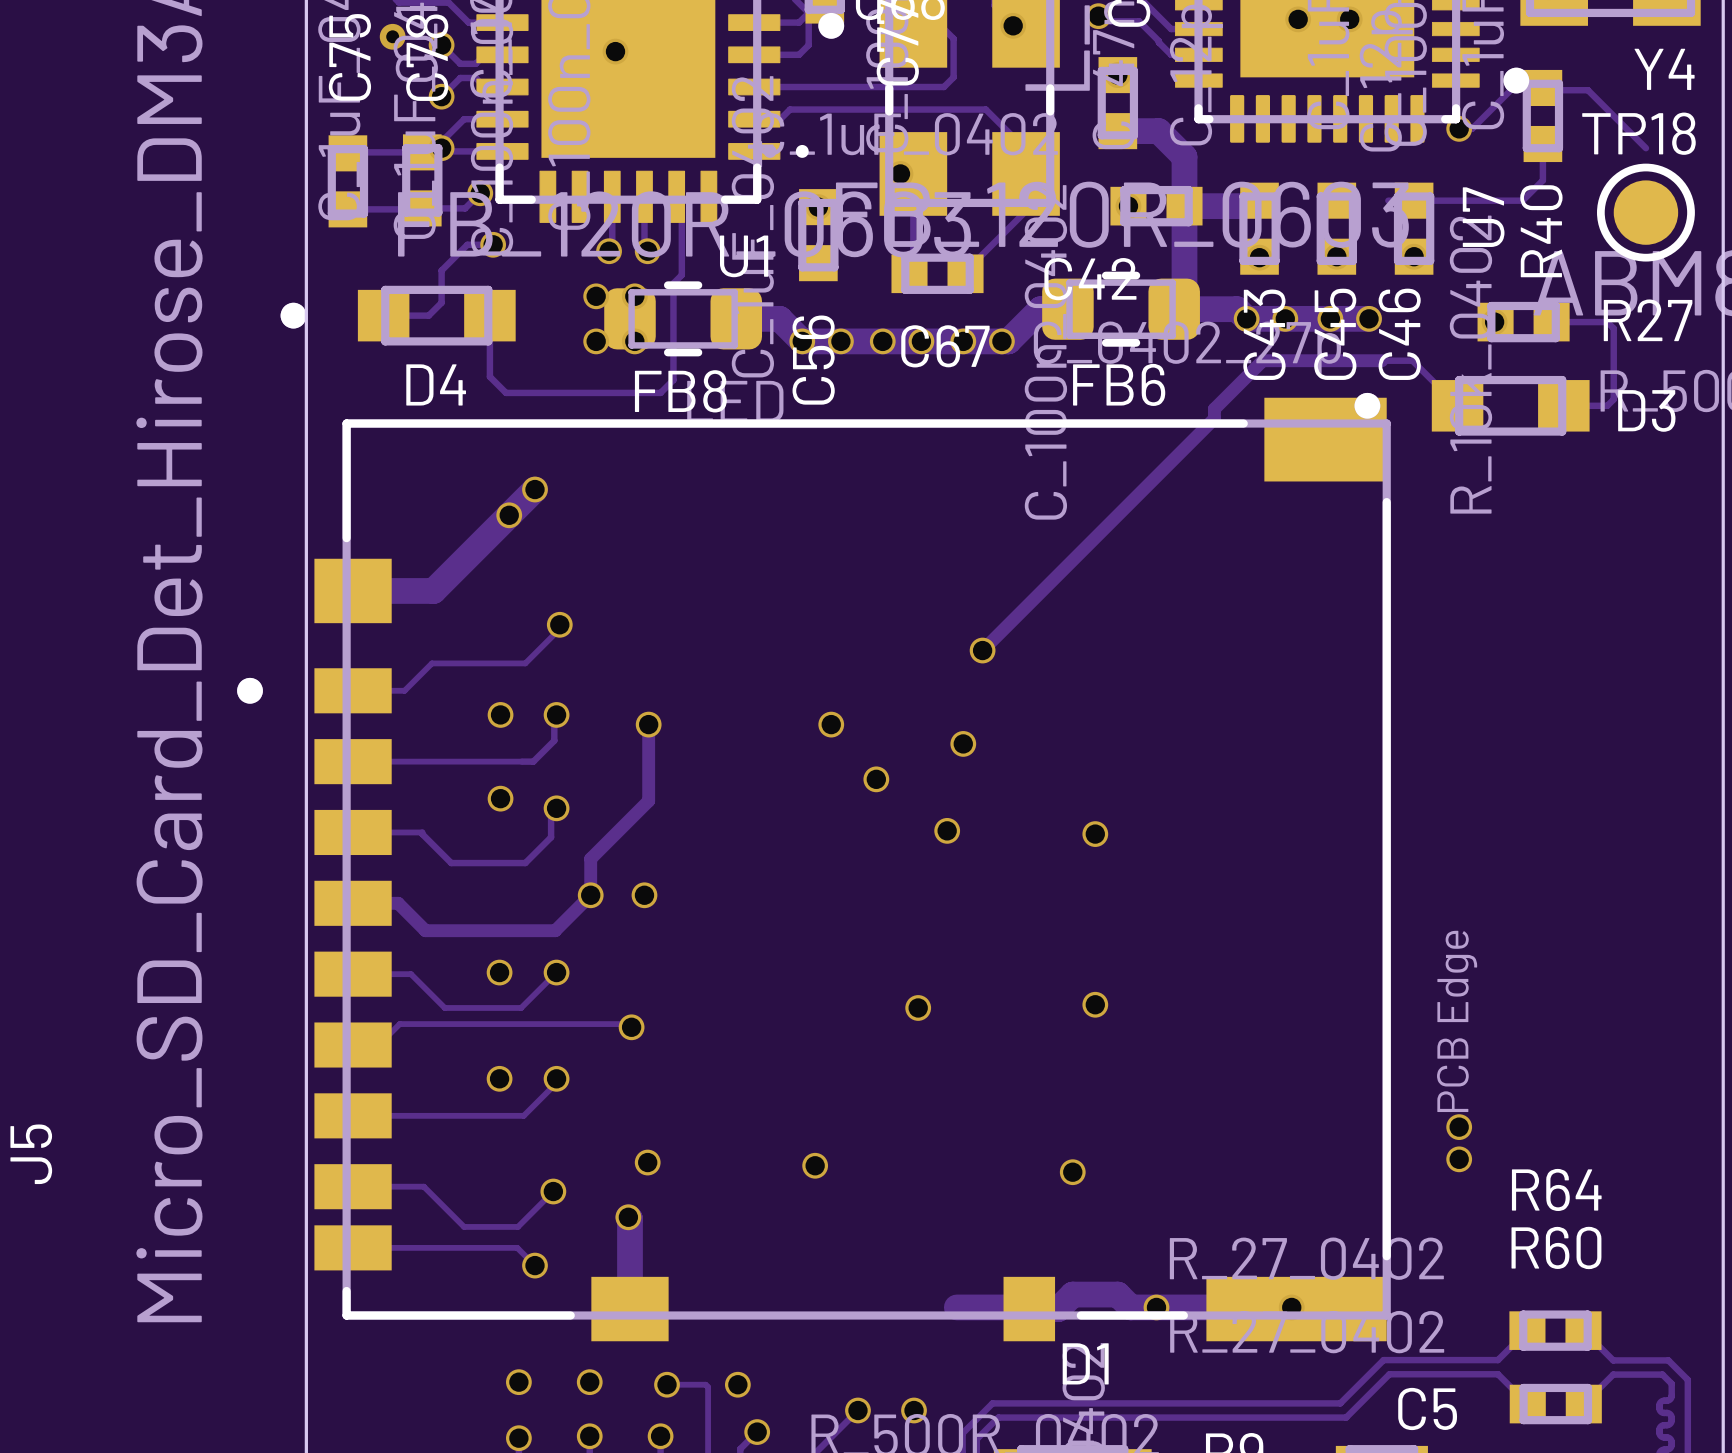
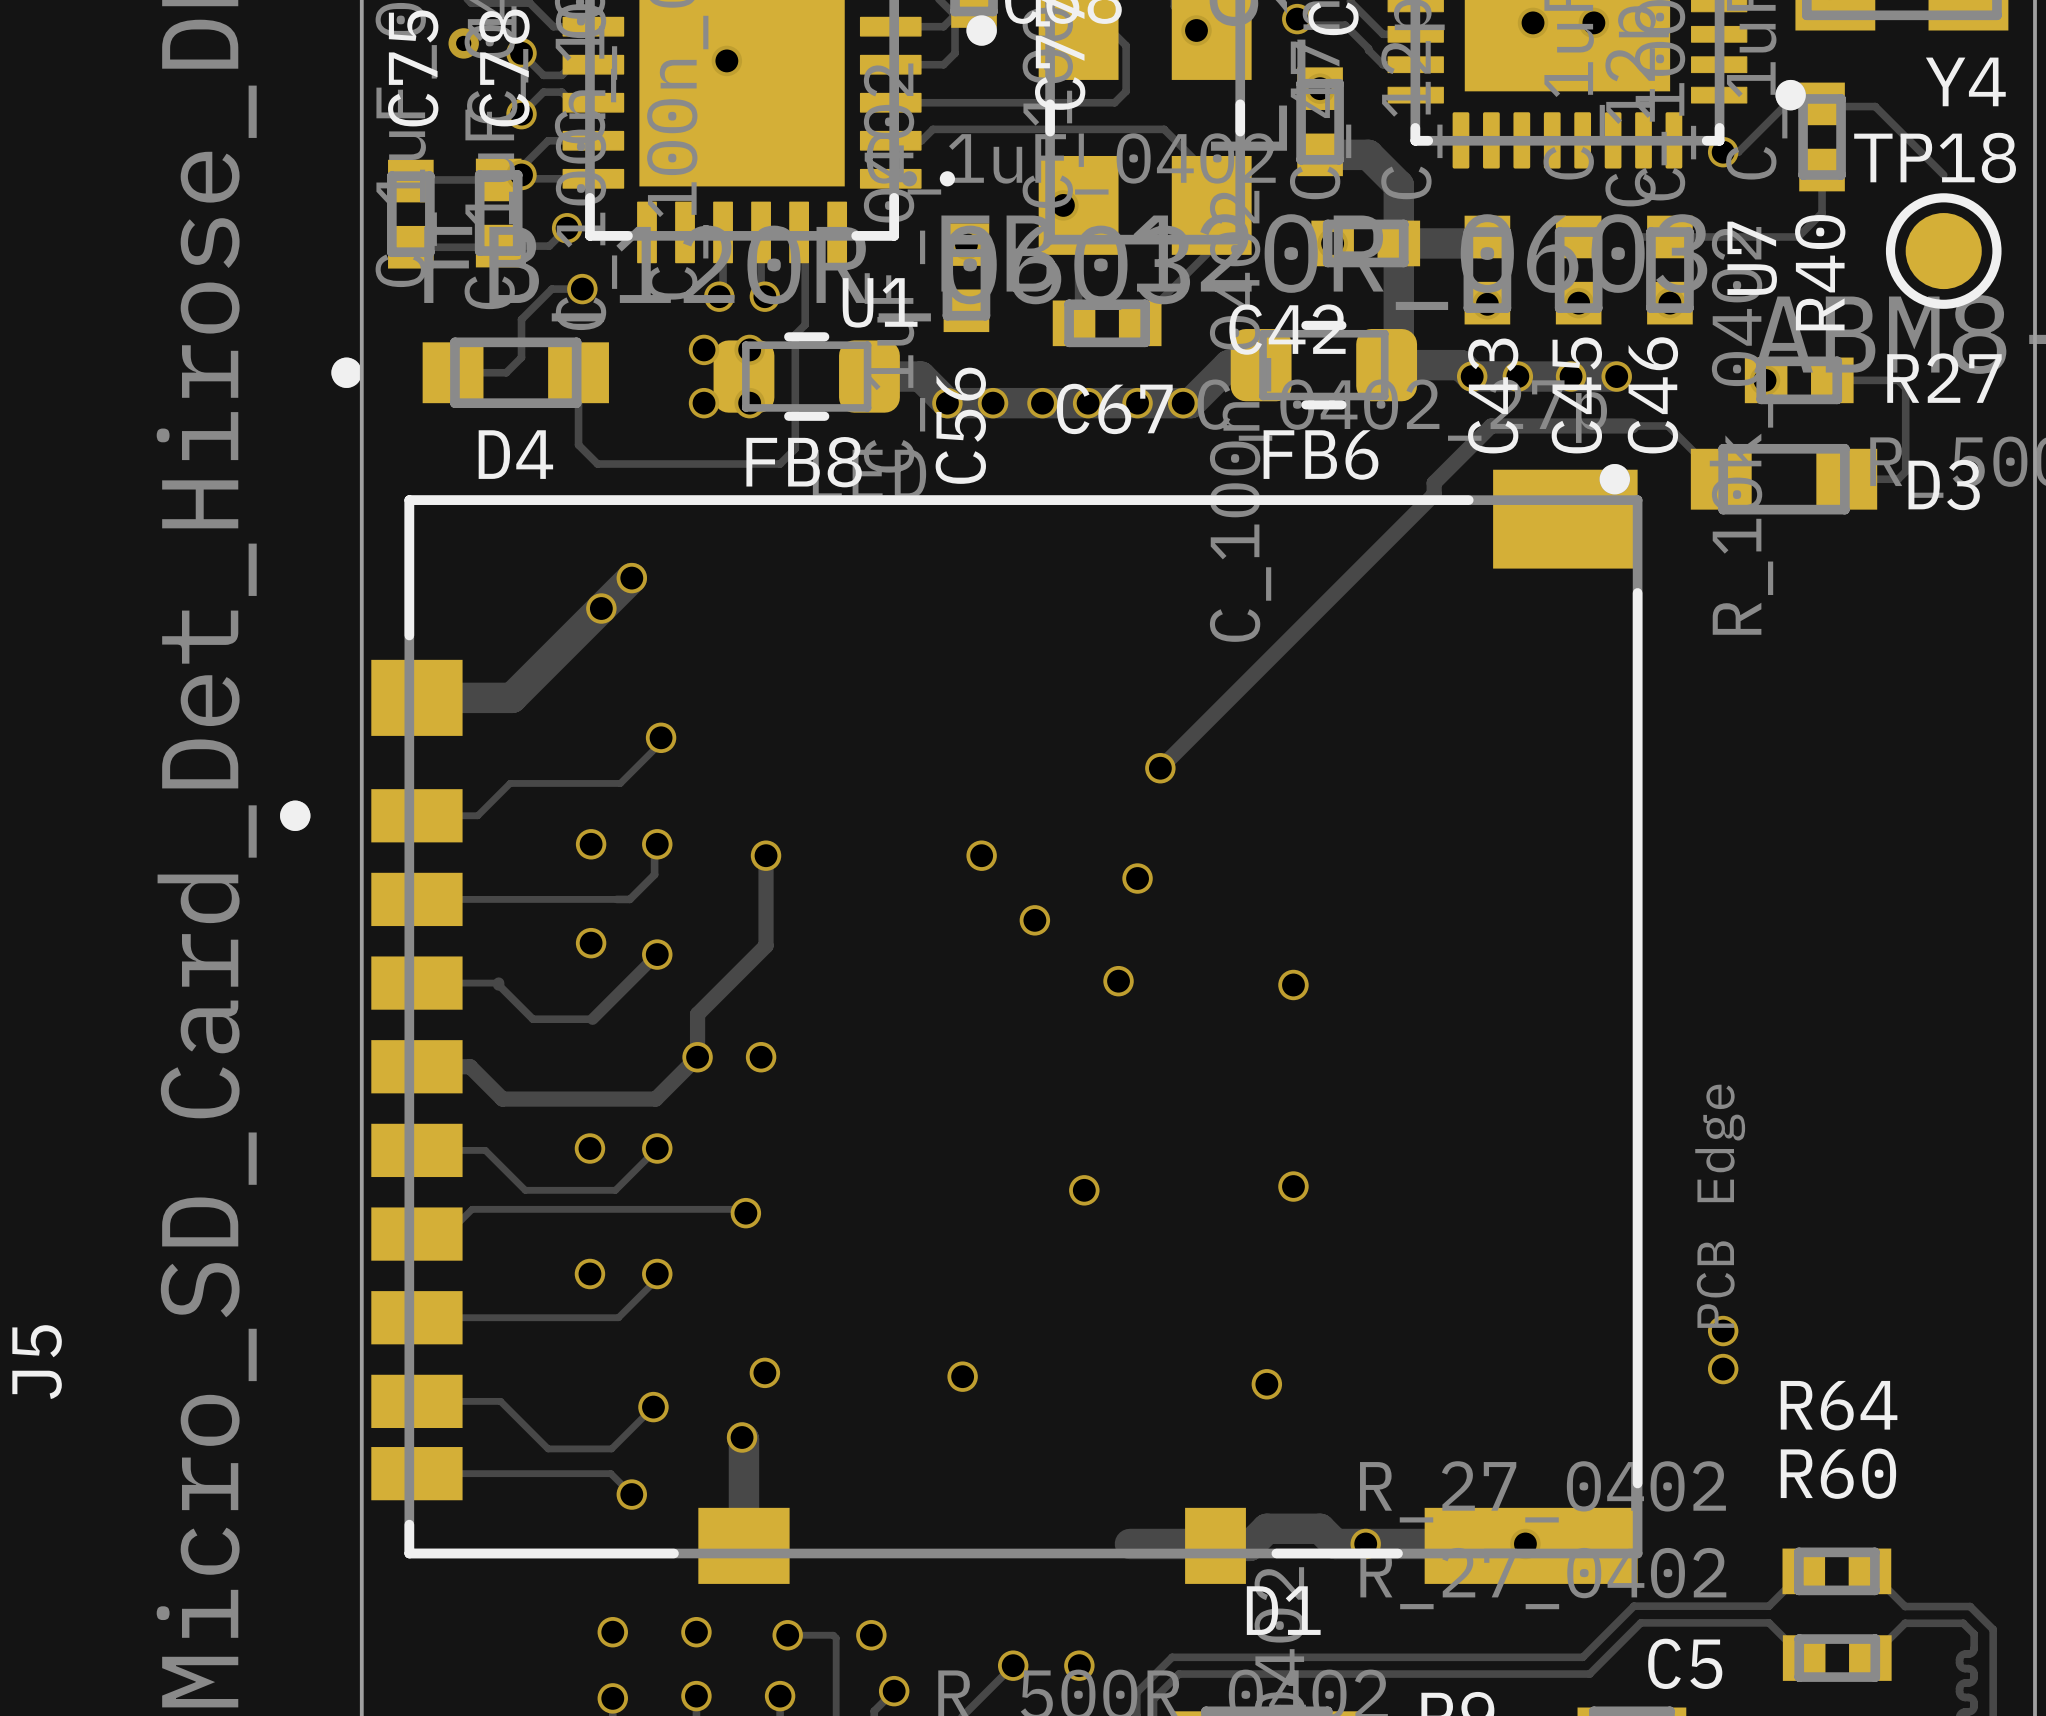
track: (551, 813) (551, 837) (525, 863) (501, 863) -> (650, 961) (592, 1019)

